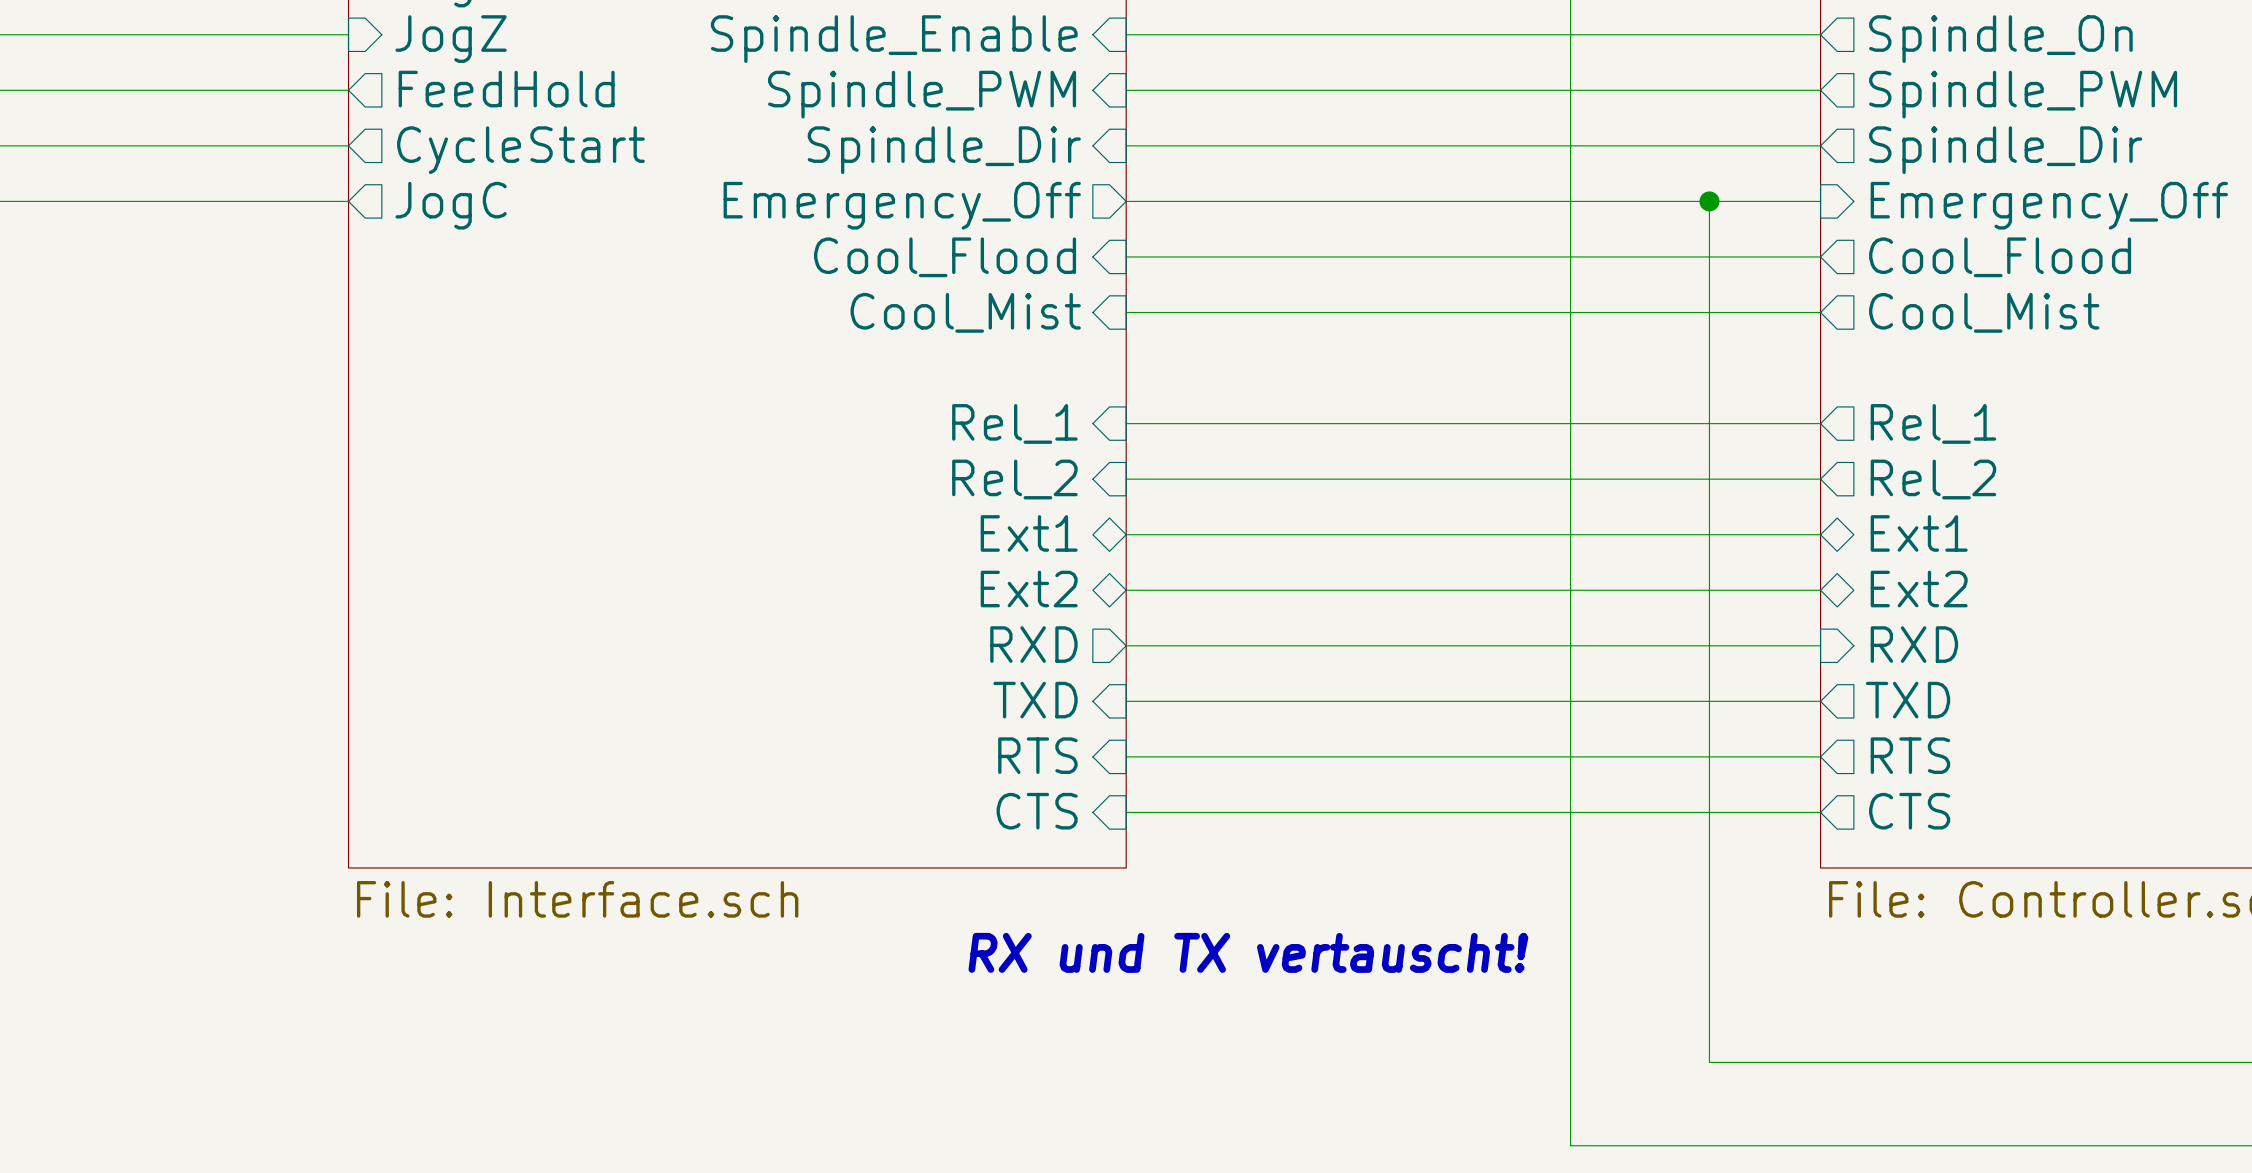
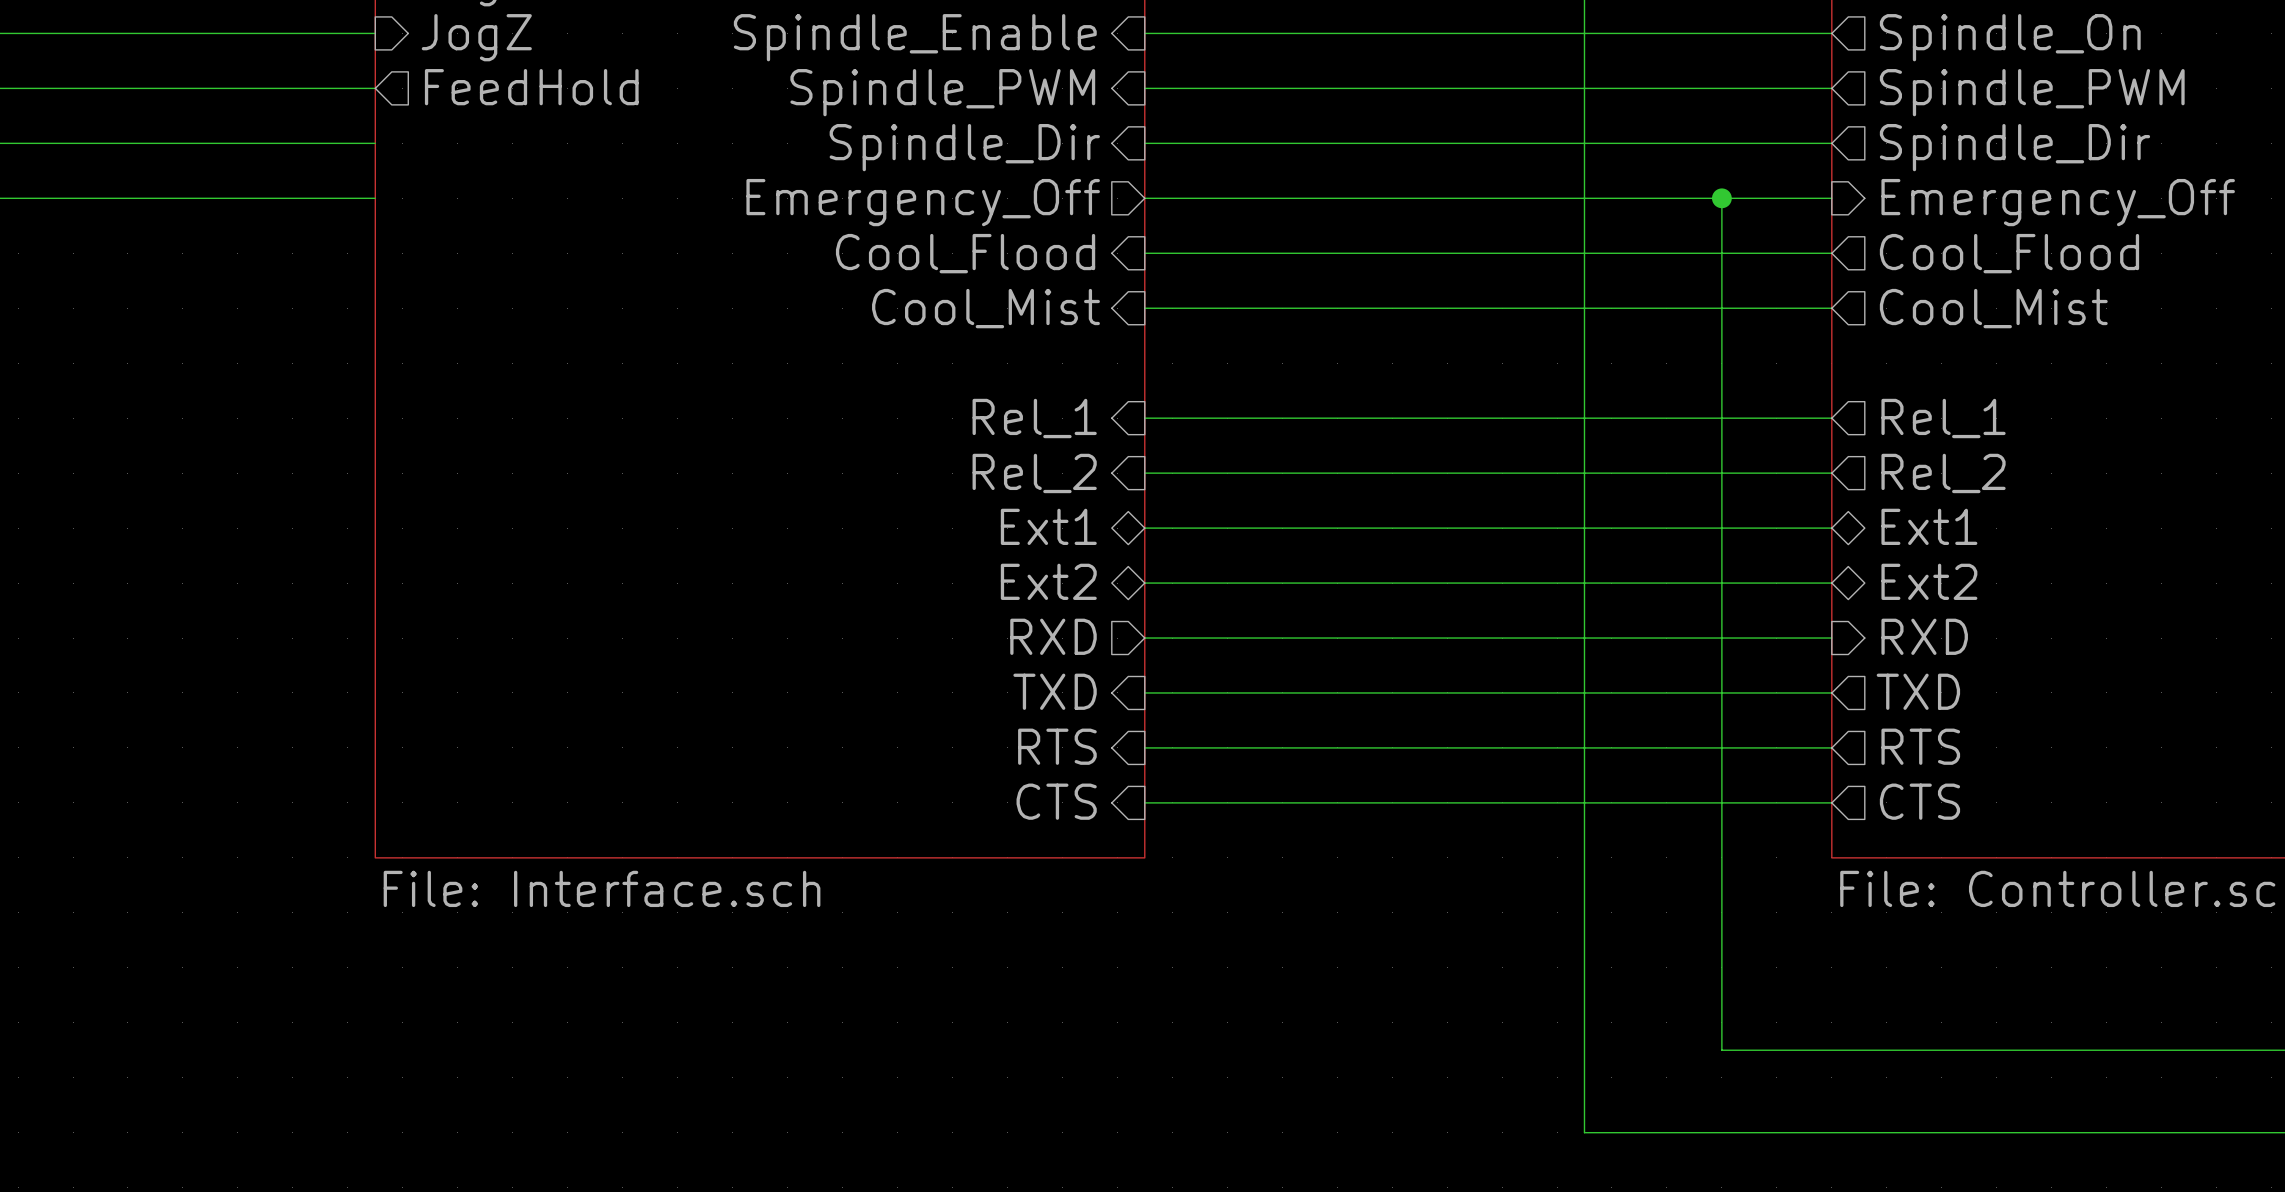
sheet pin: CycleStart (520, 150) -> none
sheet pin: JogC (451, 205) -> none
text: RX und TX vertauscht! (1248, 952) -> none

